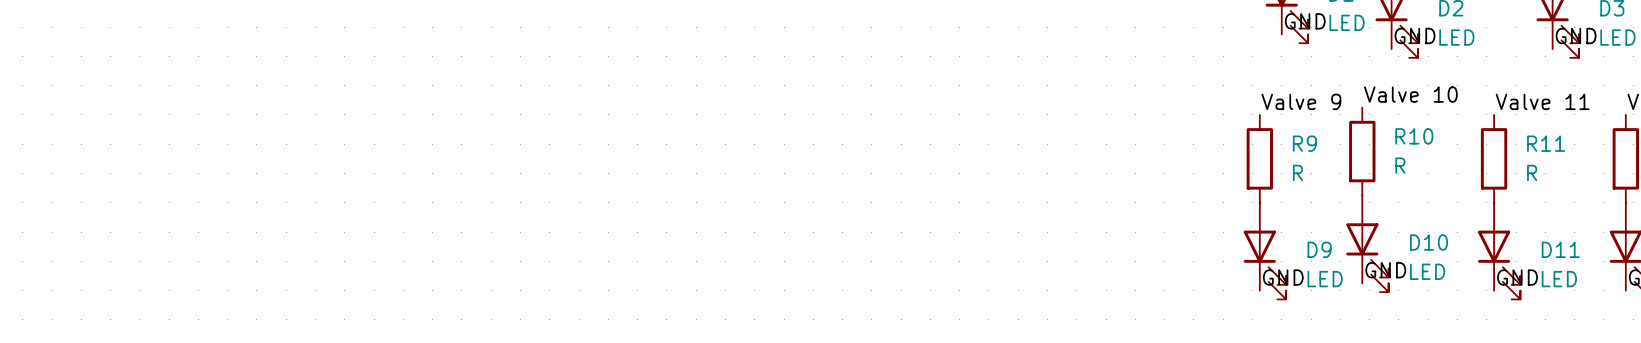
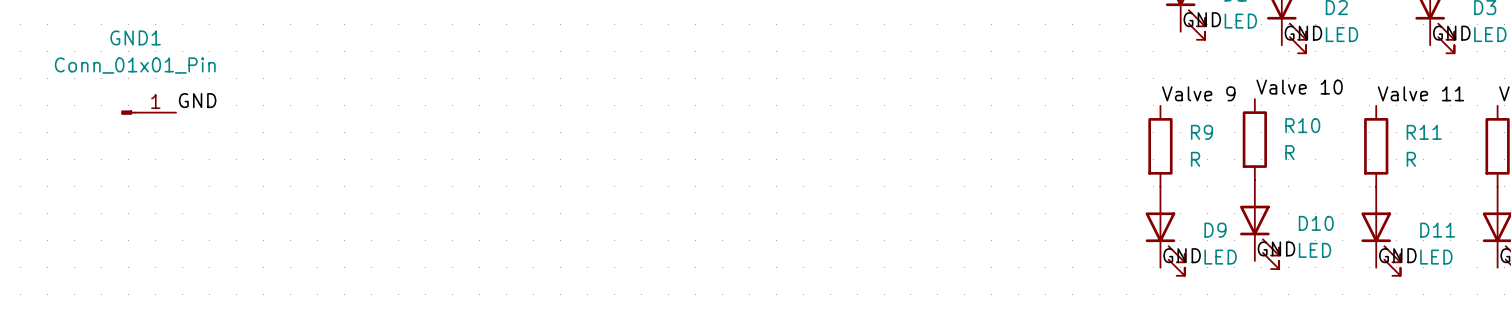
label: none -> GND (197, 100)
GND1: none -> Conn_01x01_Pin (148, 112)

